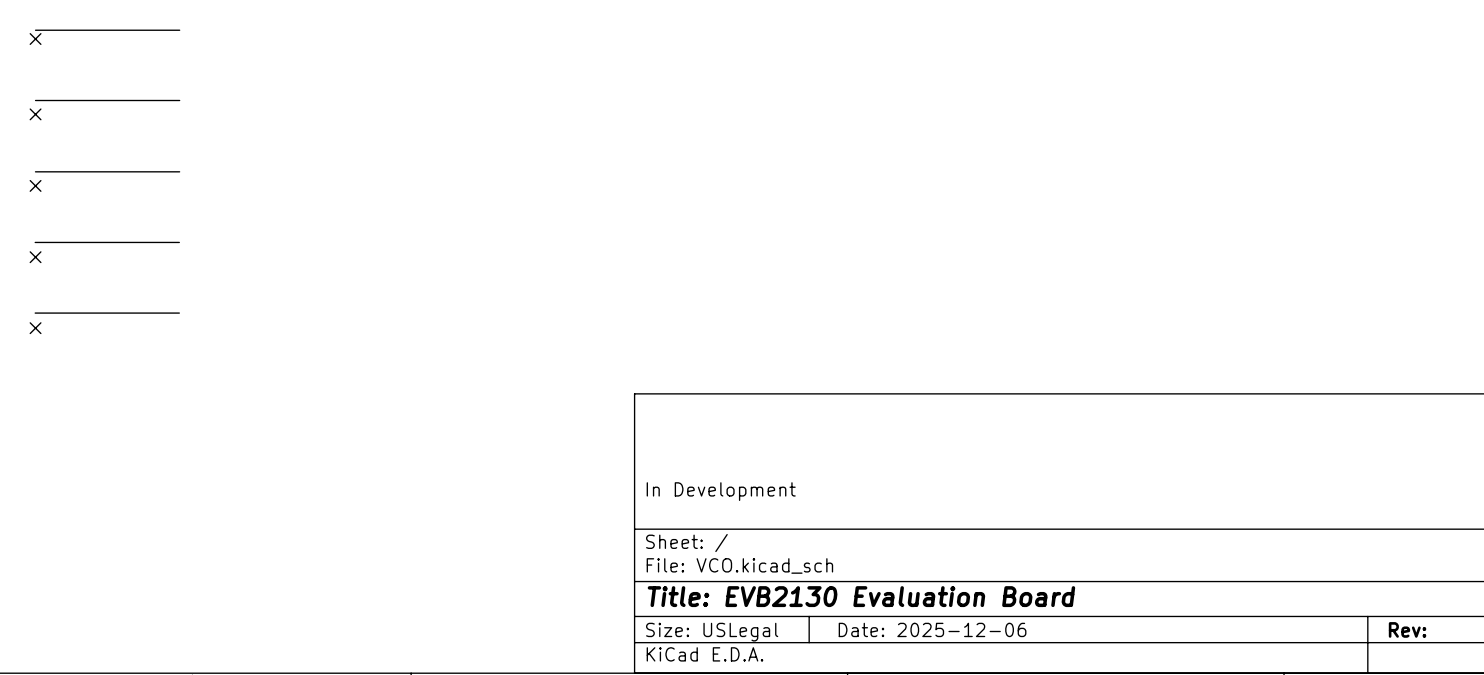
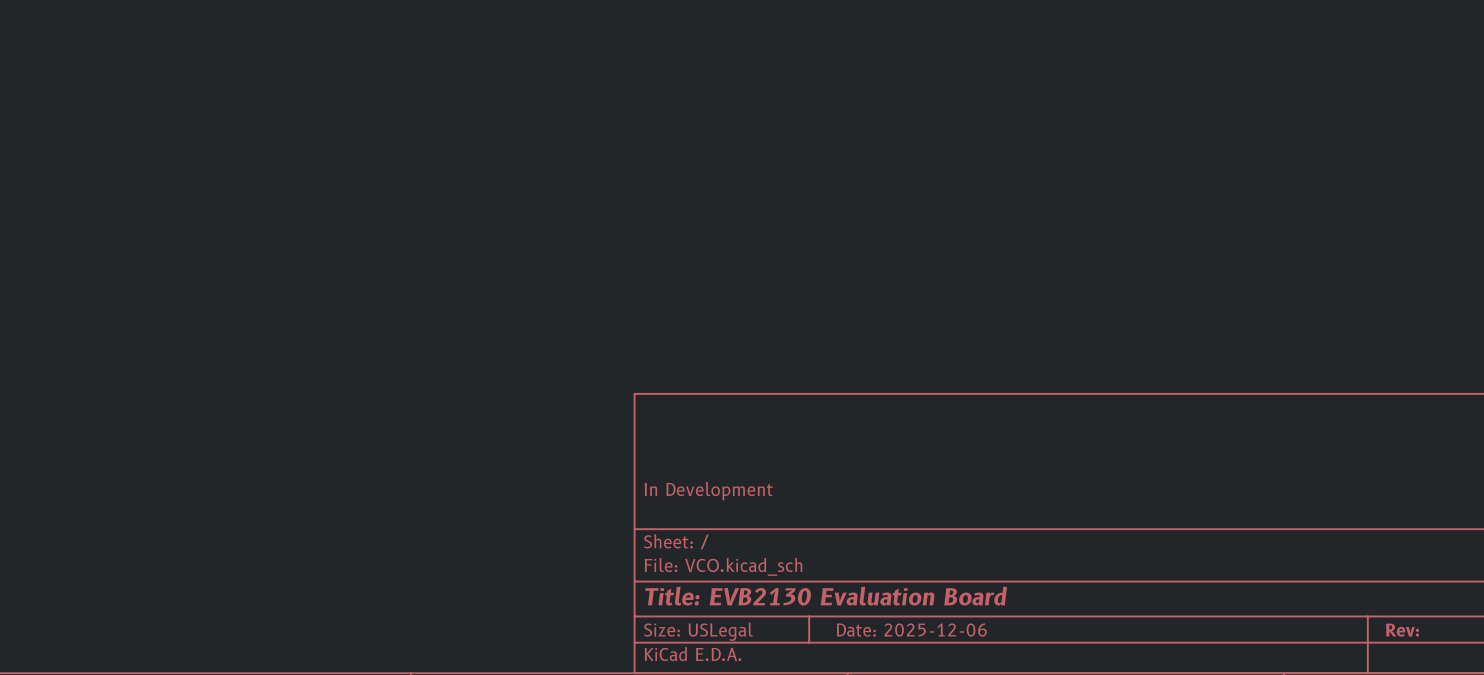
wire: (35, 30) (179, 30) -> none
no-connect mark: (35, 39) -> none
wire: (35, 100) (179, 100) -> none
no-connect mark: (35, 114) -> none
wire: (35, 171) (179, 171) -> none
no-connect mark: (35, 185) -> none
wire: (35, 242) (179, 242) -> none
no-connect mark: (35, 257) -> none
wire: (35, 313) (179, 313) -> none
no-connect mark: (35, 328) -> none

